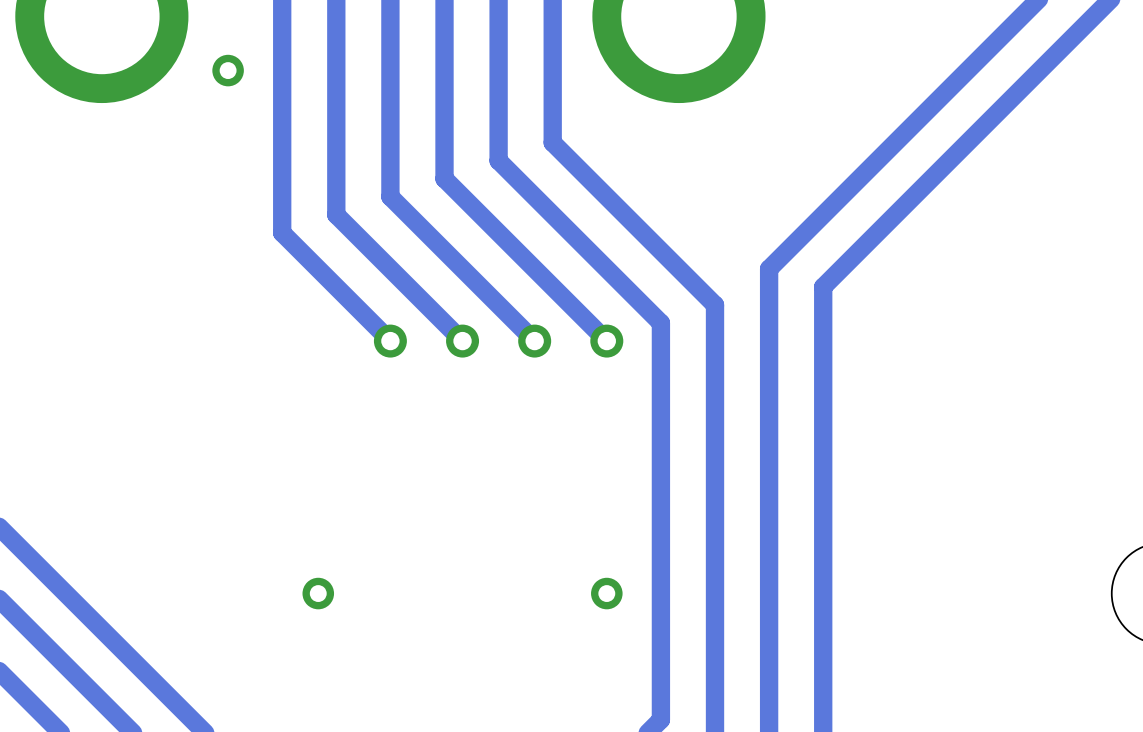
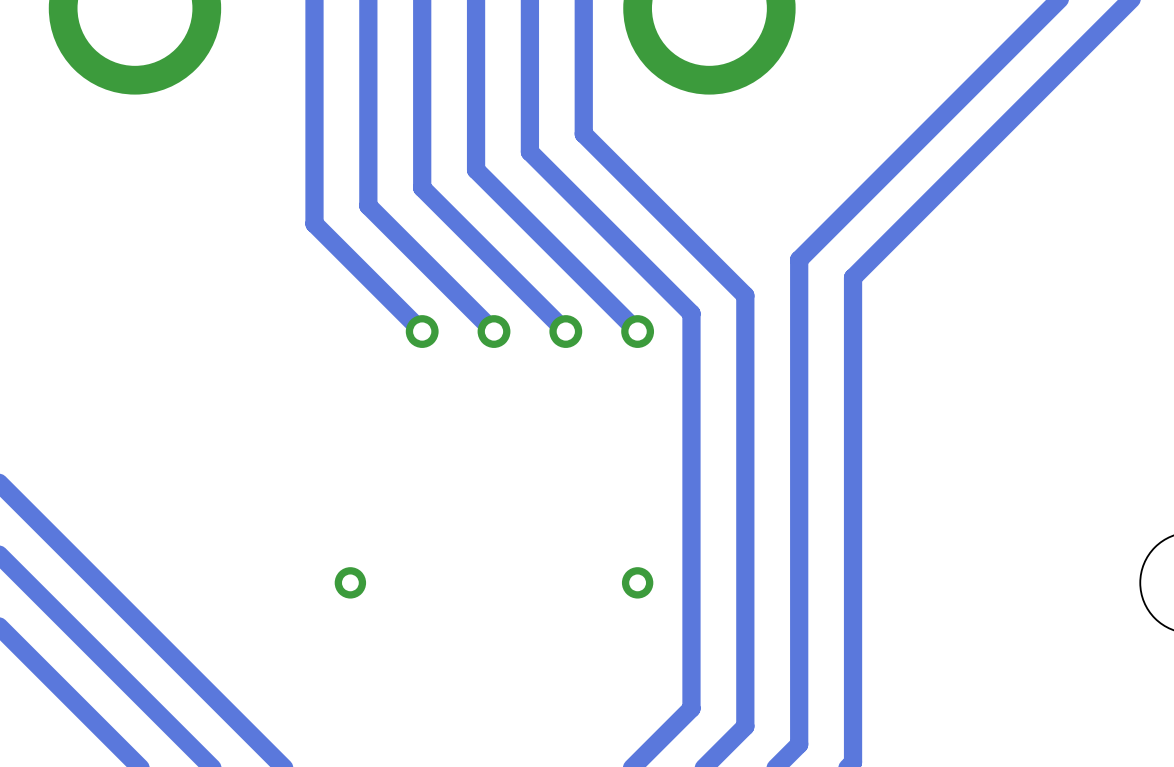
via: (228, 70) -> none

